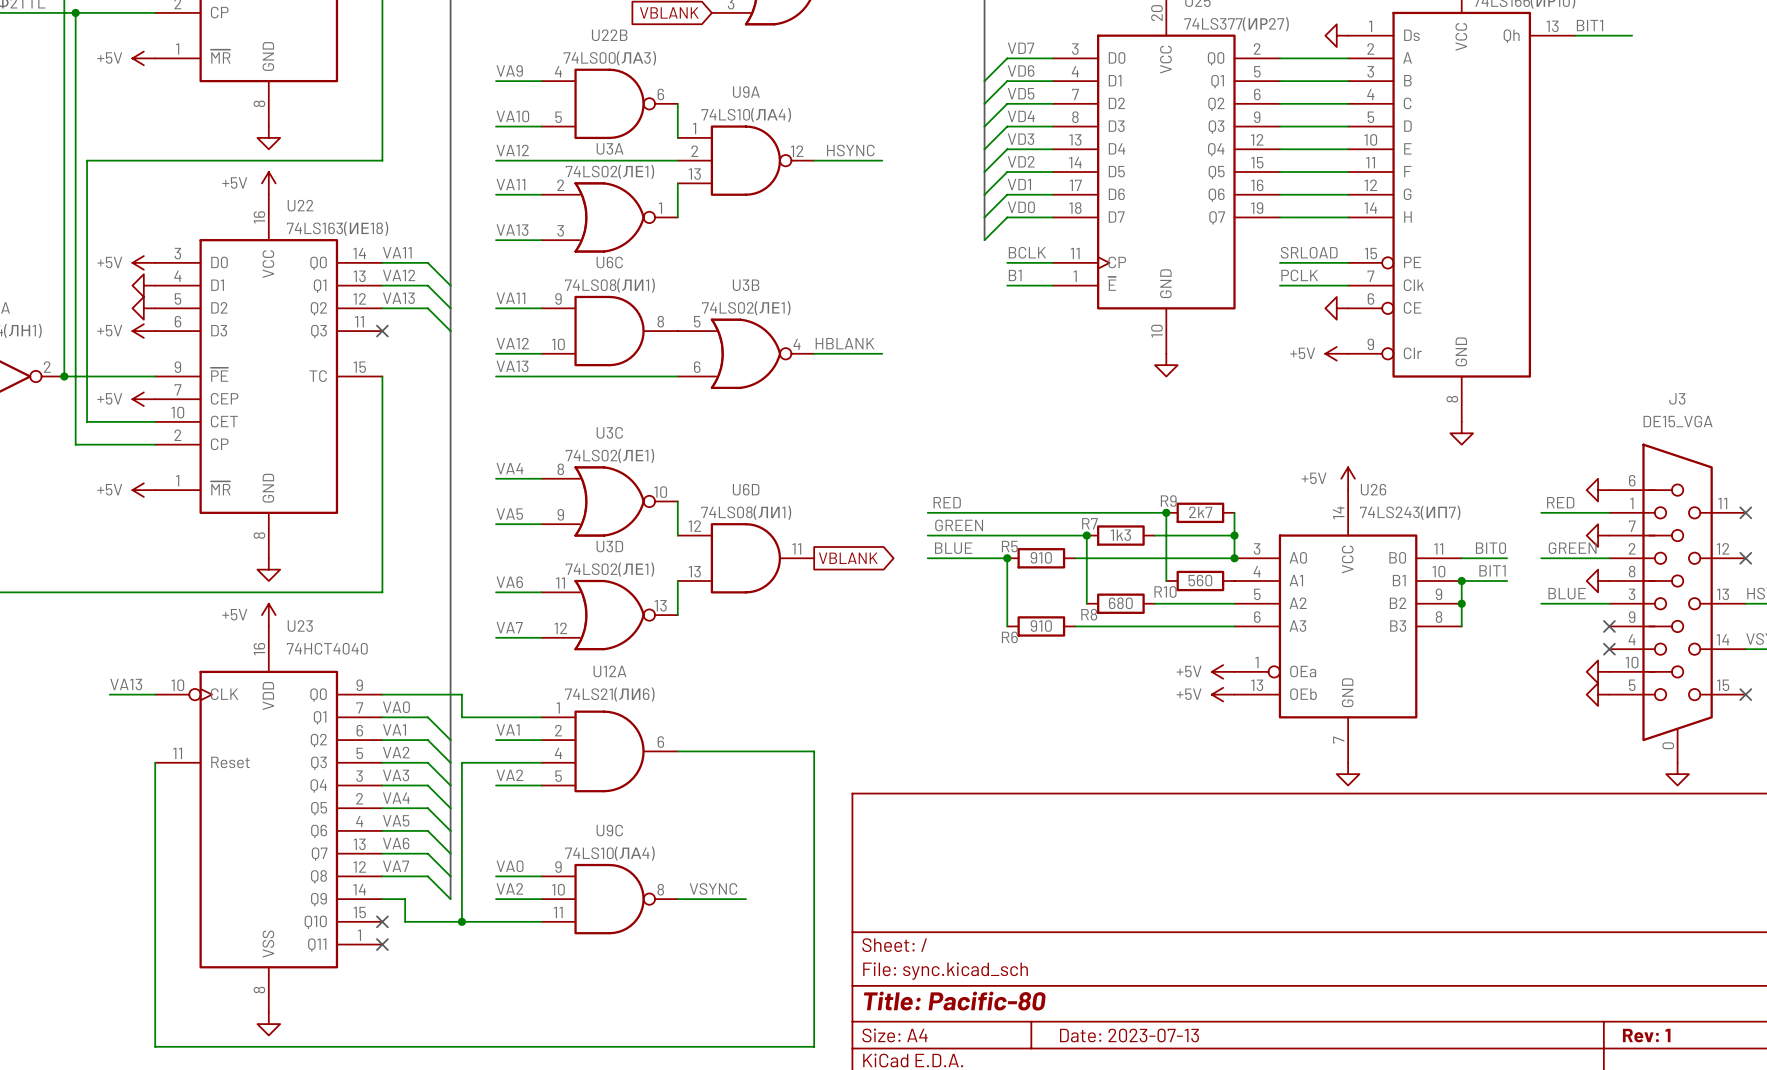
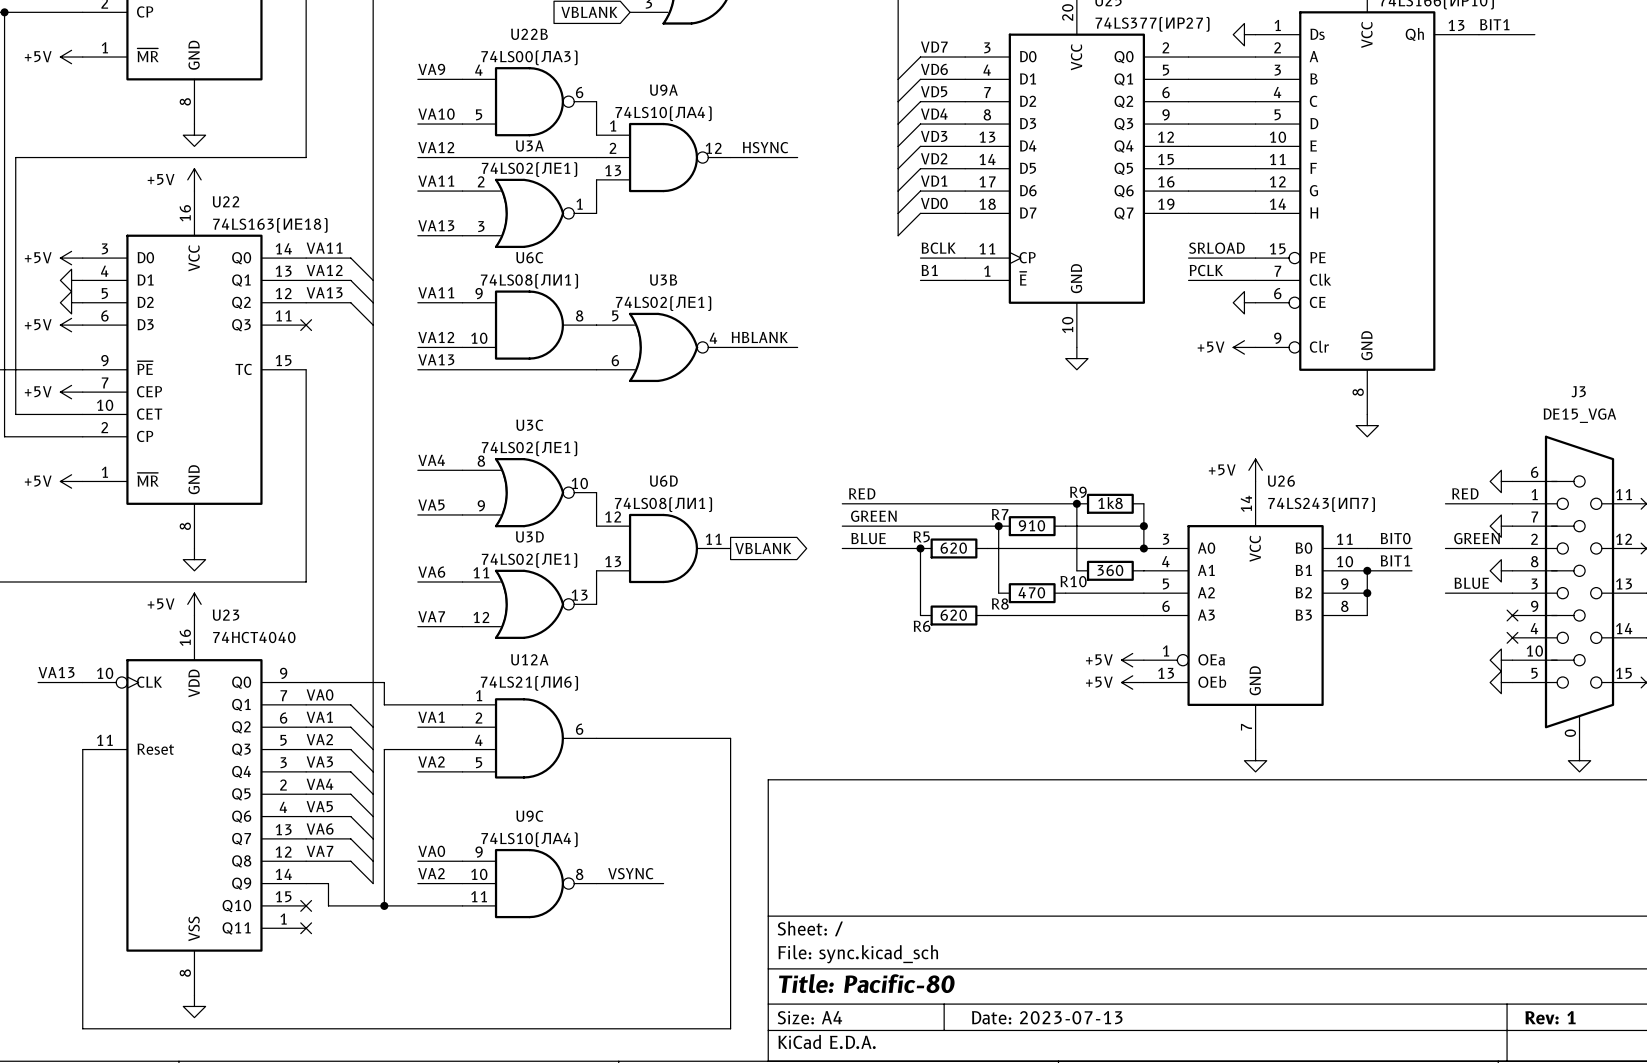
R9 value: 2k7 (1200, 512) -> 1k8 (1110, 503)
R7 value: 1k3 (1120, 535) -> 910 (1031, 525)
R5 value: 910 (1041, 557) -> 620 (953, 548)
R10 value: 560 (1200, 580) -> 360 (1110, 570)
R8 value: 680 (1120, 603) -> 470 (1031, 592)
R6 value: 910 (1041, 626) -> 620 (953, 615)

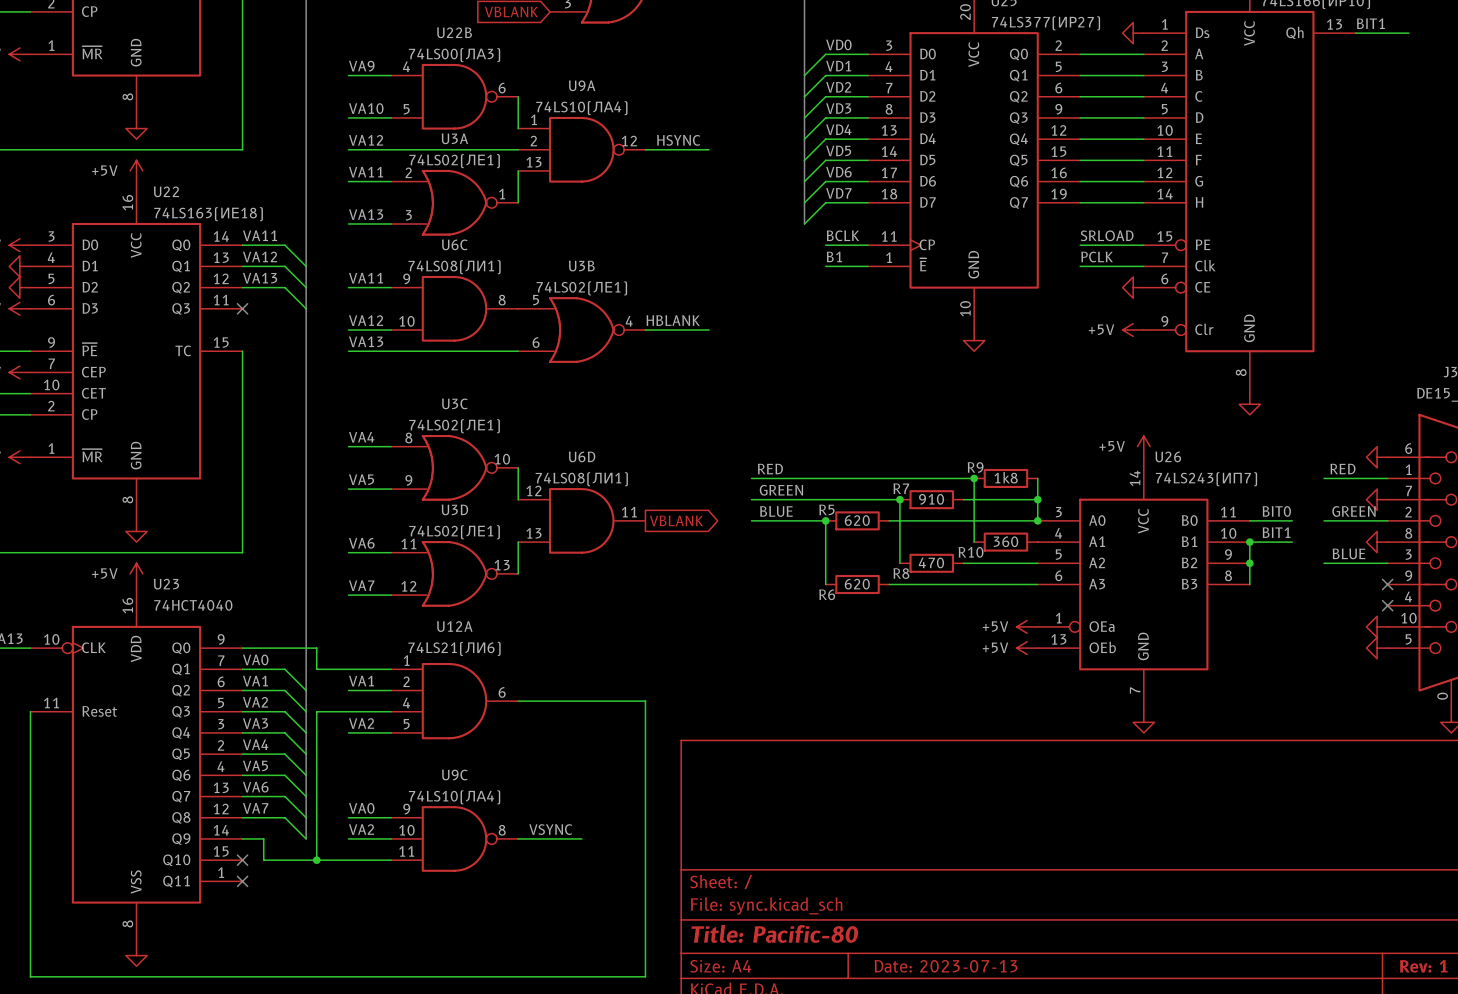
label: VD7 (934, 47) -> VD0 (838, 44)
label: VD6 (934, 69) -> VD1 (838, 66)
label: VD5 (934, 91) -> VD2 (838, 87)
label: VD4 (934, 114) -> VD3 (838, 108)
label: VD3 (934, 136) -> VD4 (838, 129)
label: VD2 (934, 158) -> VD5 (838, 150)
label: VD1 (934, 181) -> VD6 (838, 172)
label: VD0 (934, 203) -> VD7 (838, 193)

